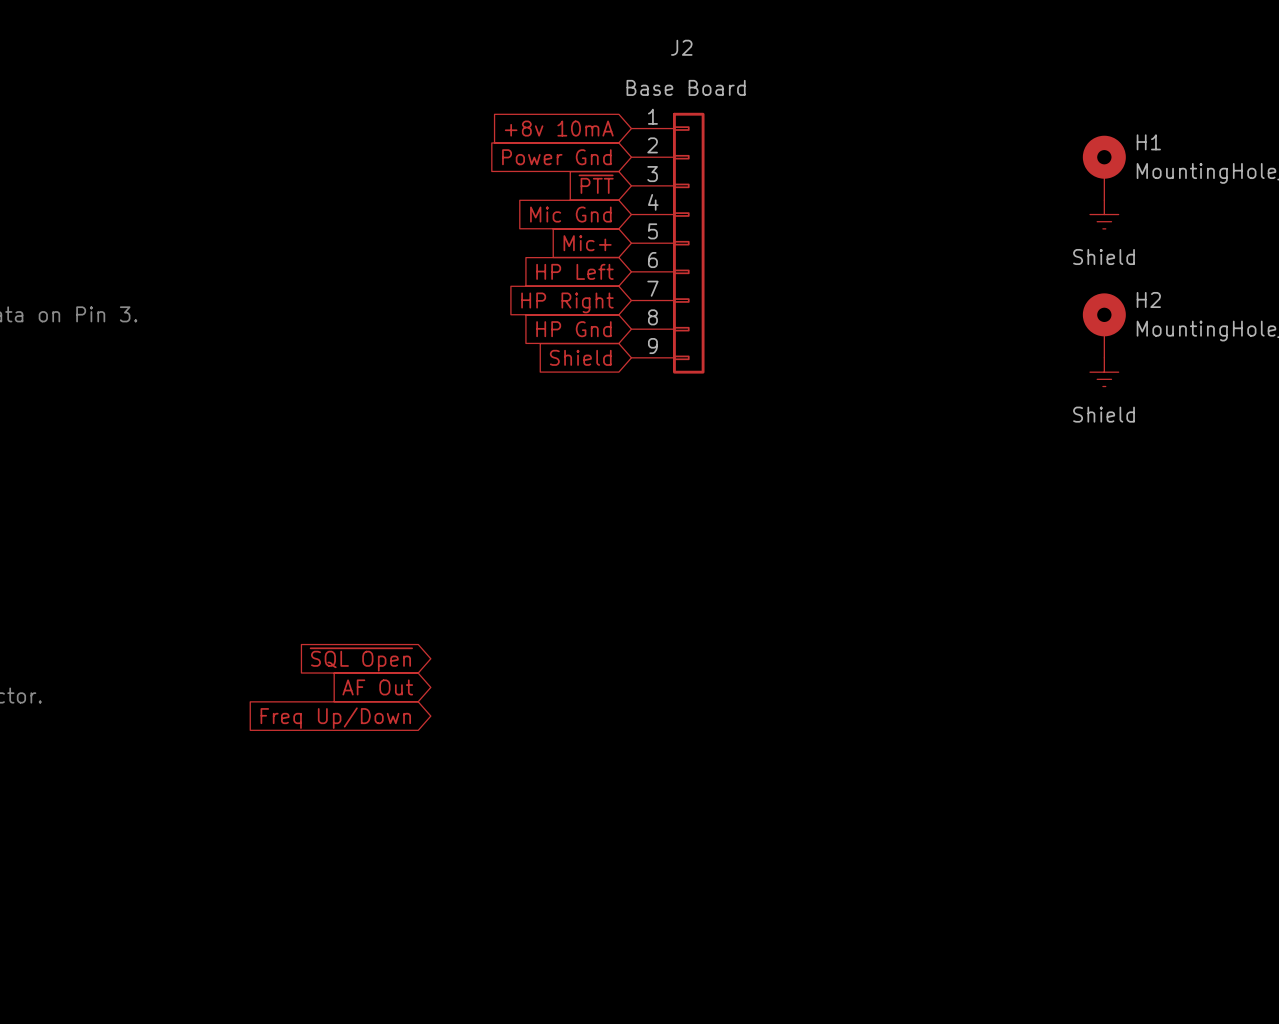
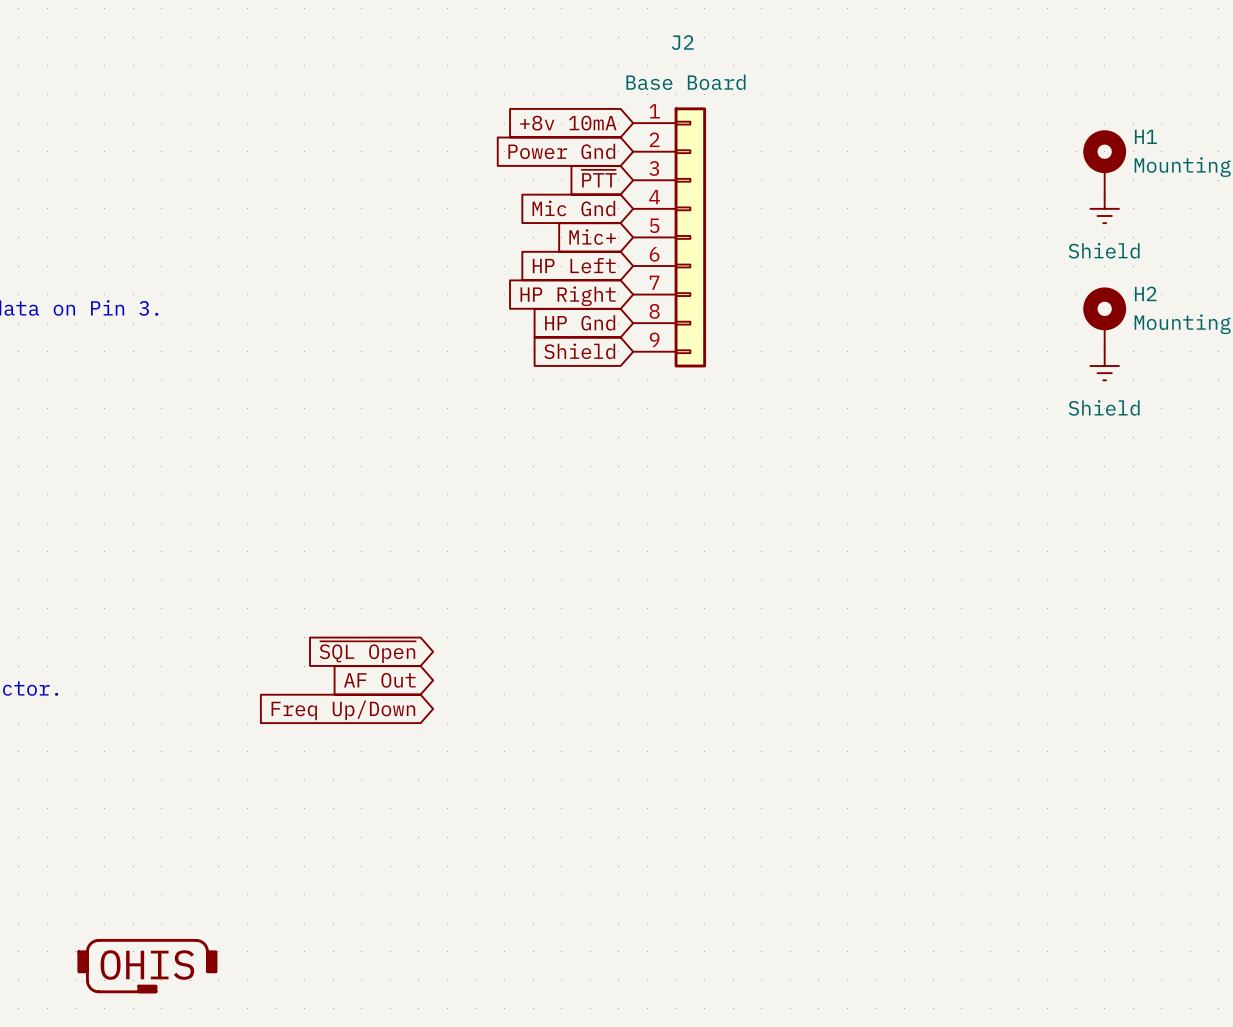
part: none -> (147, 966)

